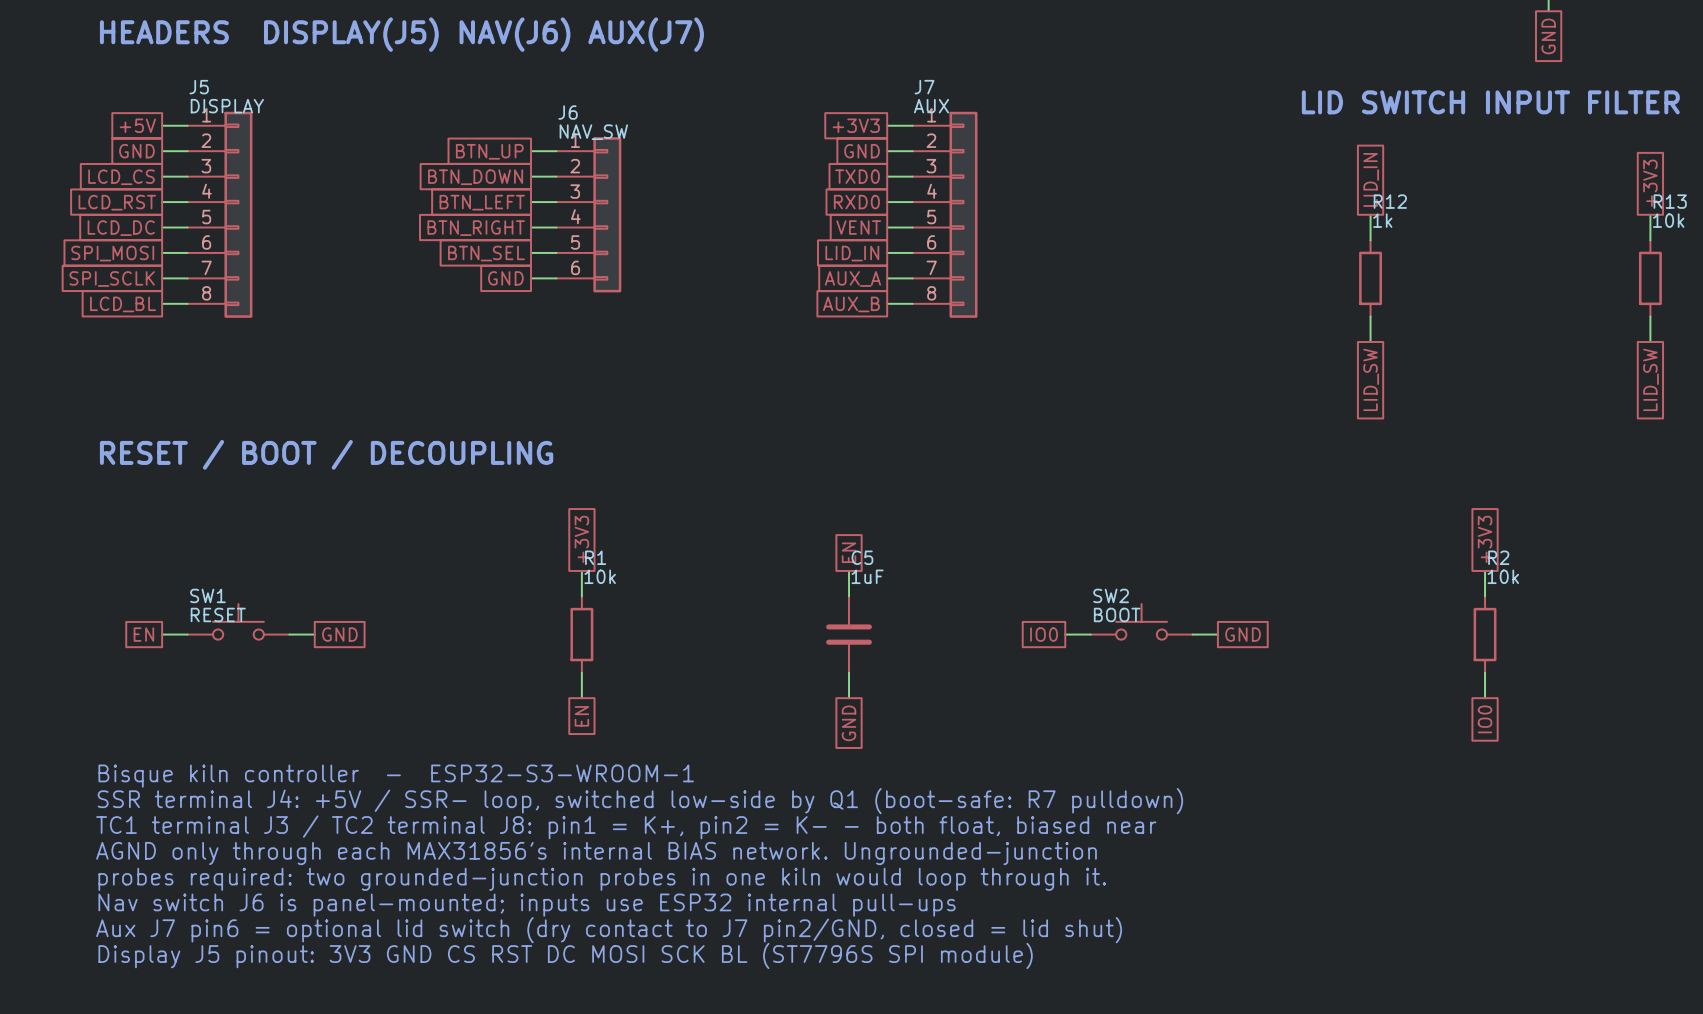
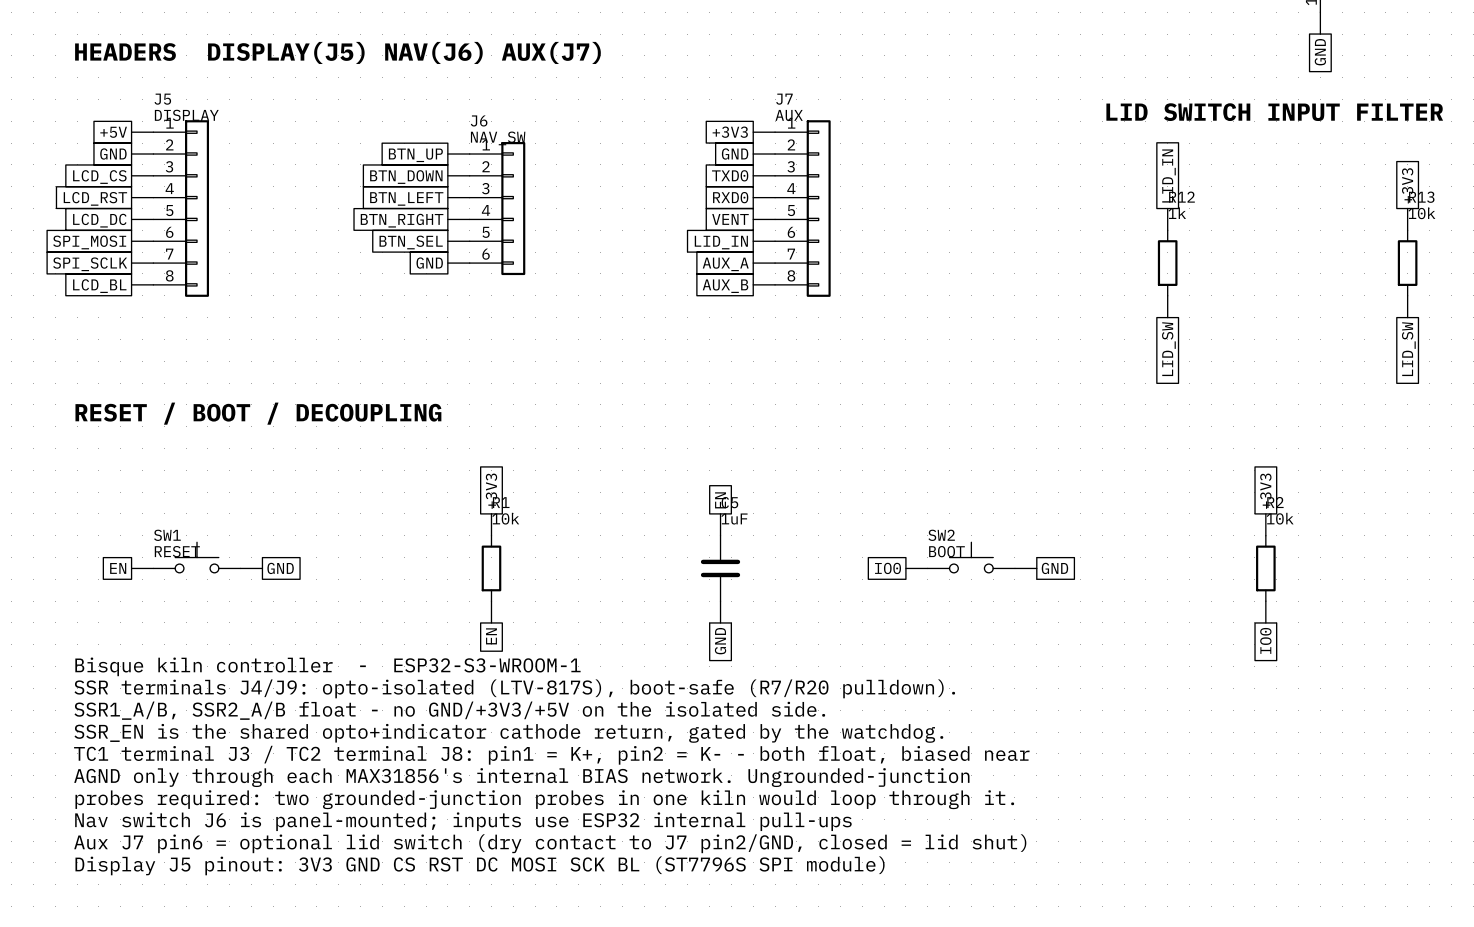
text: none -> Bisque kiln controller - ESP32-S3-WROOM-1 (327, 666)
text: Bisque kiln controller - ESP32-S3-WROOM-1 (396, 776) -> SSR terminals J4/J9: opto-isolated (LTV-817S), boot-safe (R7/R20 pulldown). (514, 688)
text: SSR terminal J4: +5V / SSR- loop, switched low-side by Q1 (boot-safe: R7 pulldown) (640, 801) -> SSR1_A/B, SSR2_A/B float - no GND/+3V3/+5V on the isolated side. (449, 710)
text: TC1 terminal J3 / TC2 terminal J8: pin1 = K+, pin2 = K- - both float, biased near (626, 827) -> SSR_EN is the shared opto+indicator cathode return, gated by the watchdog. (508, 733)
text: AGND only through each MAX31856's internal BIAS network. Ungrounded-junction (596, 853) -> TC1 terminal J3 / TC2 terminal J8: pin1 = K+, pin2 = K- - both float, biased near (551, 755)
text: probes required: two grounded-junction probes in one kiln would loop through it. (602, 879) -> AGND only through each MAX31856's internal BIAS network. Ungrounded-junction (521, 777)
text: Nav switch J6 is panel-mounted; inputs use ESP32 internal pull-ups (527, 905) -> probes required: two grounded-junction probes in one kiln would loop through it. (544, 799)
text: Aux J7 pin6 = optional lid switch (dry contact to J7 pin2/GND, closed = lid shut) (609, 930) -> Nav switch J6 is panel-mounted; inputs use ESP32 internal pull-ups (463, 821)
text: Display J5 pinout: 3V3 GND CS RST DC MOSI SCK BL (ST7796S SPI module) (565, 955) -> Aux J7 pin6 = optional lid switch (dry contact to J7 pin2/GND, closed = lid shut) (550, 843)
text: none -> Display J5 pinout: 3V3 GND CS RST DC MOSI SCK BL (ST7796S SPI module) (480, 865)

